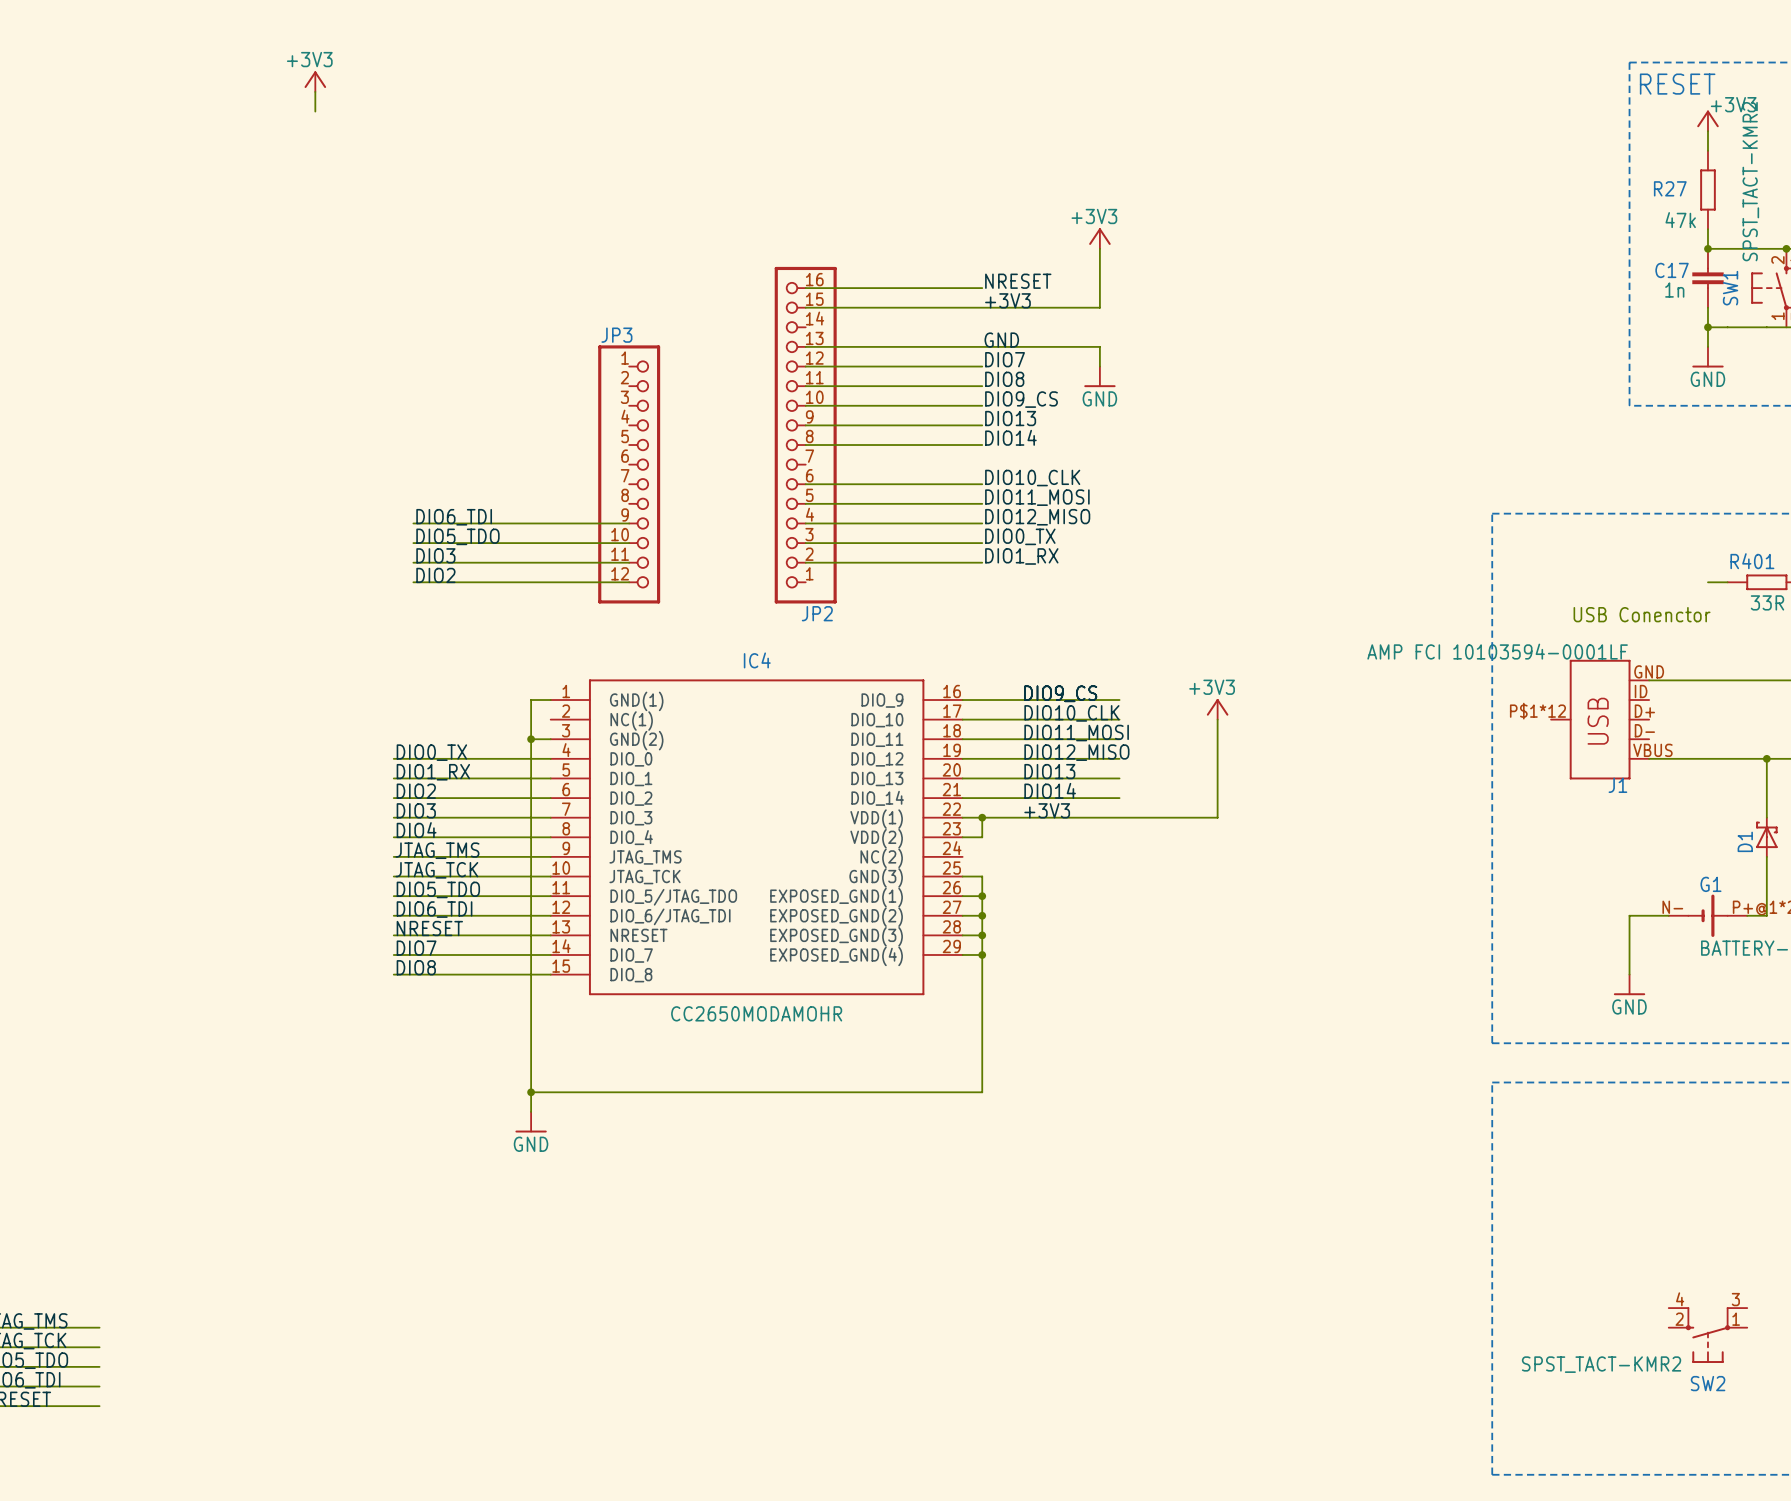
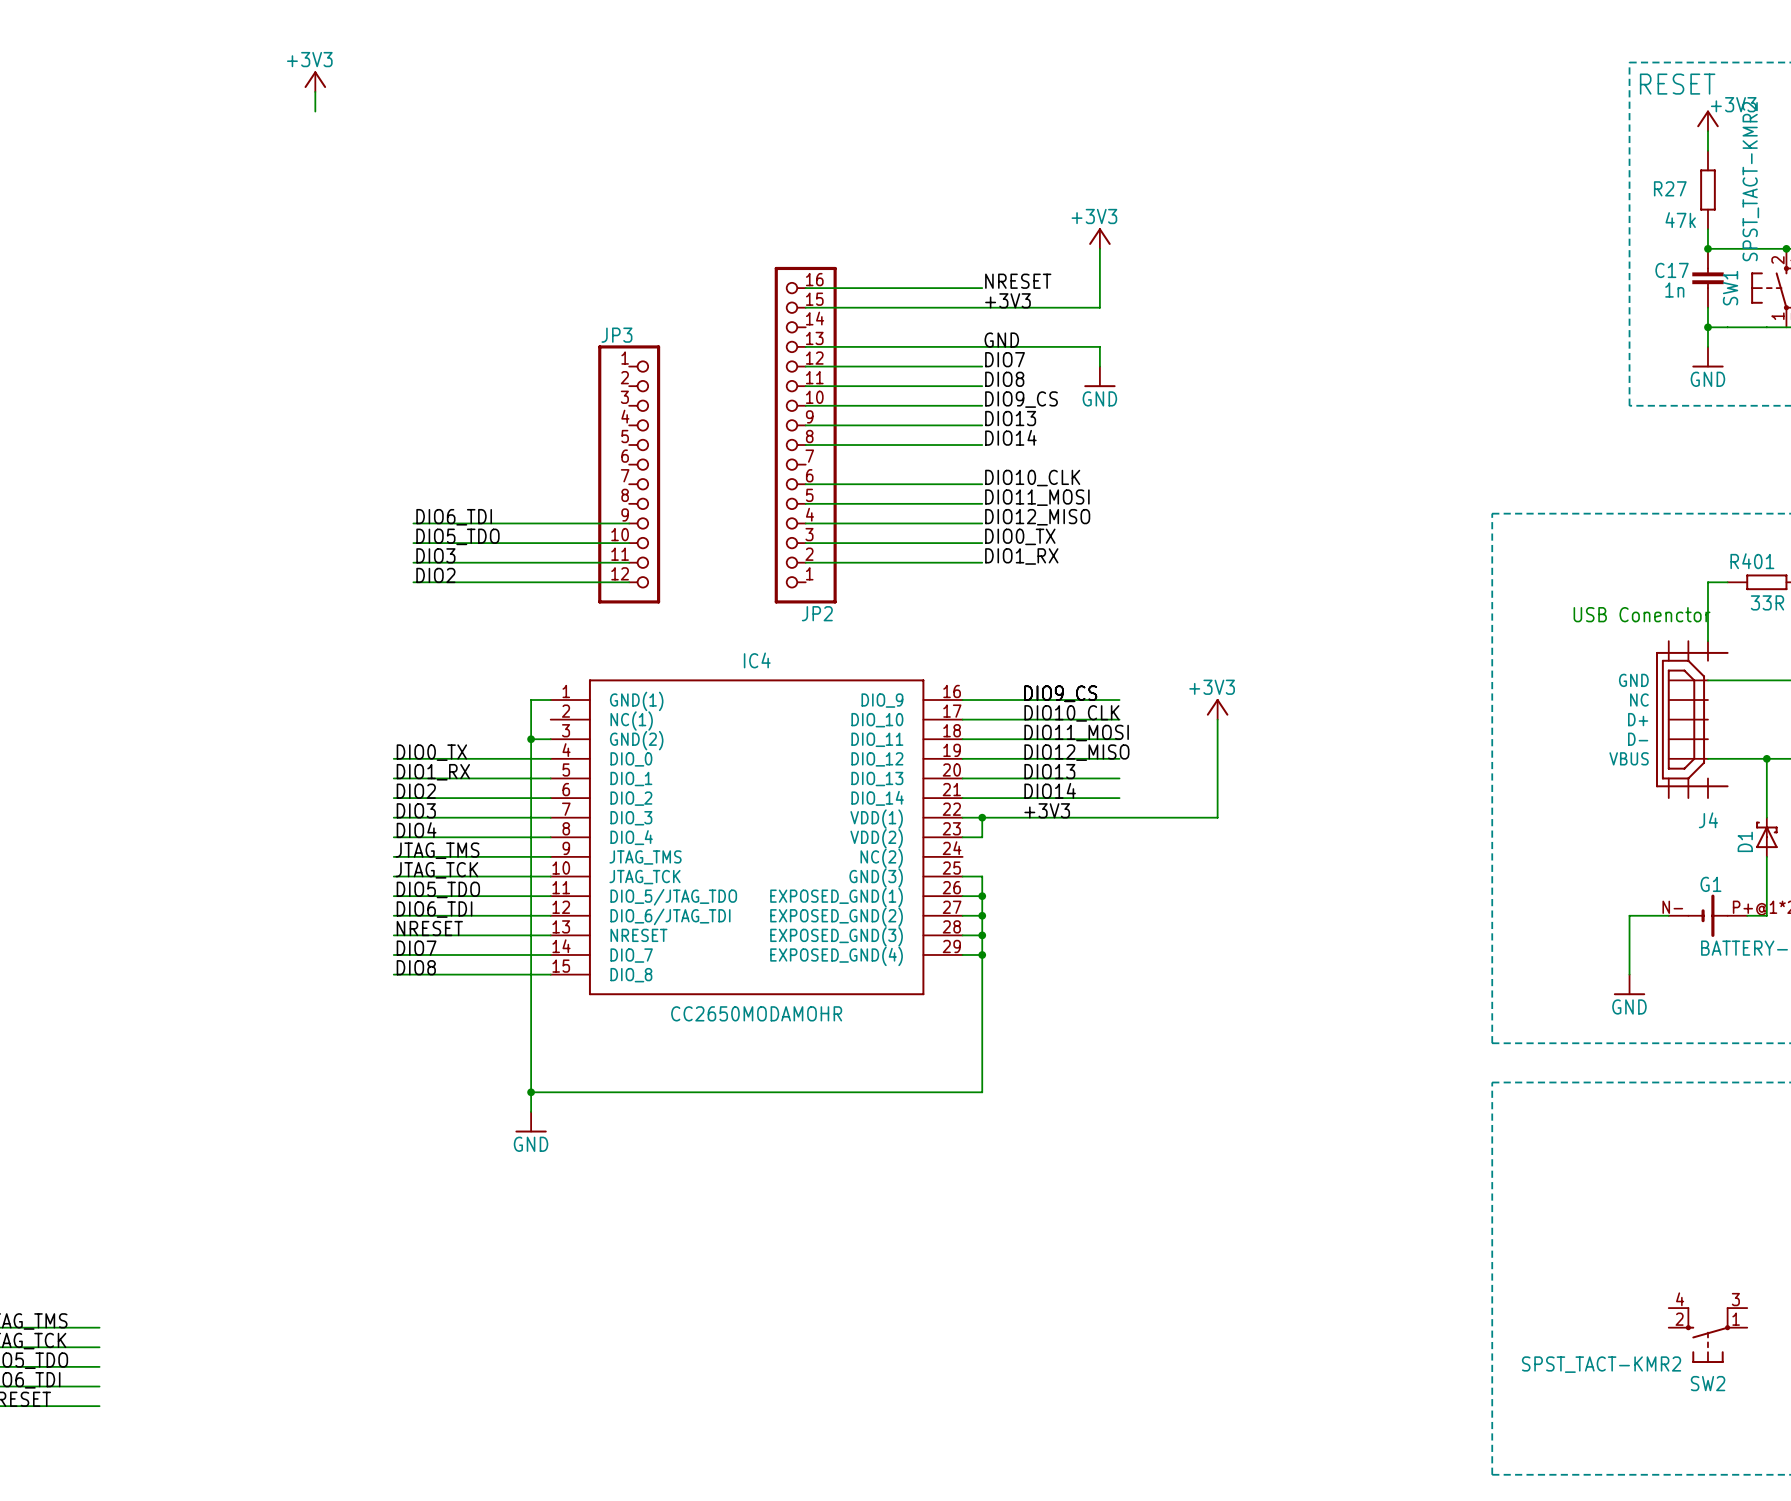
wire: none -> (1707, 582) (1707, 641)
J1: AMP FCI 10103594-0001LF (1600, 719) -> none
J4: none -> (1692, 719)

